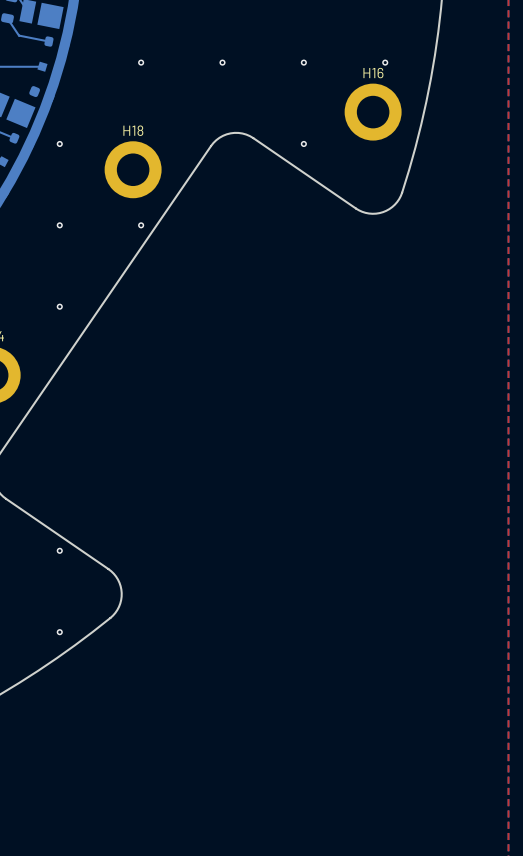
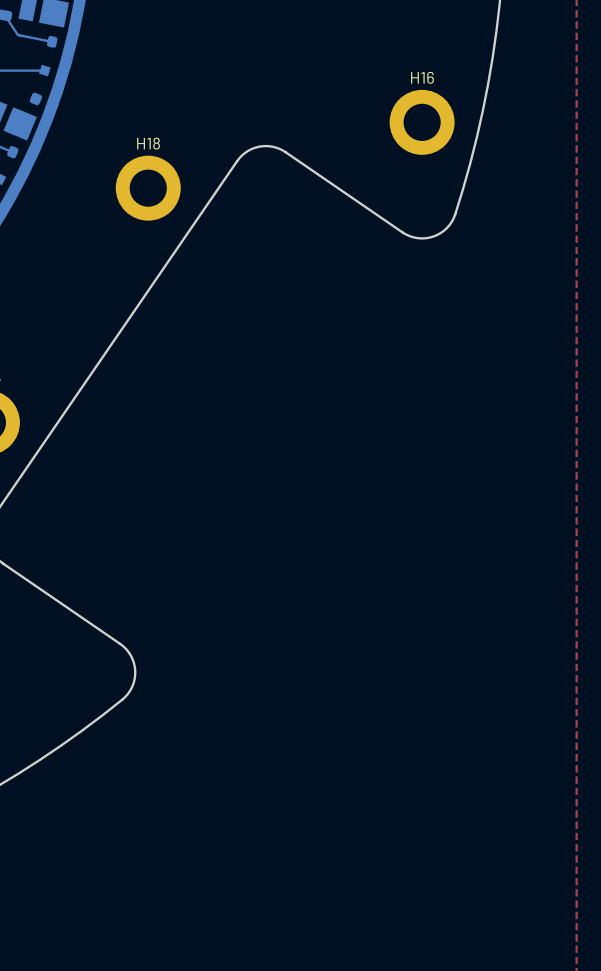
via: (141, 62) -> none
via: (222, 62) -> none
via: (303, 62) -> none
via: (385, 62) -> none
via: (59, 143) -> none
via: (303, 143) -> none
via: (59, 225) -> none
via: (141, 225) -> none
via: (59, 306) -> none
via: (59, 550) -> none
via: (59, 632) -> none

